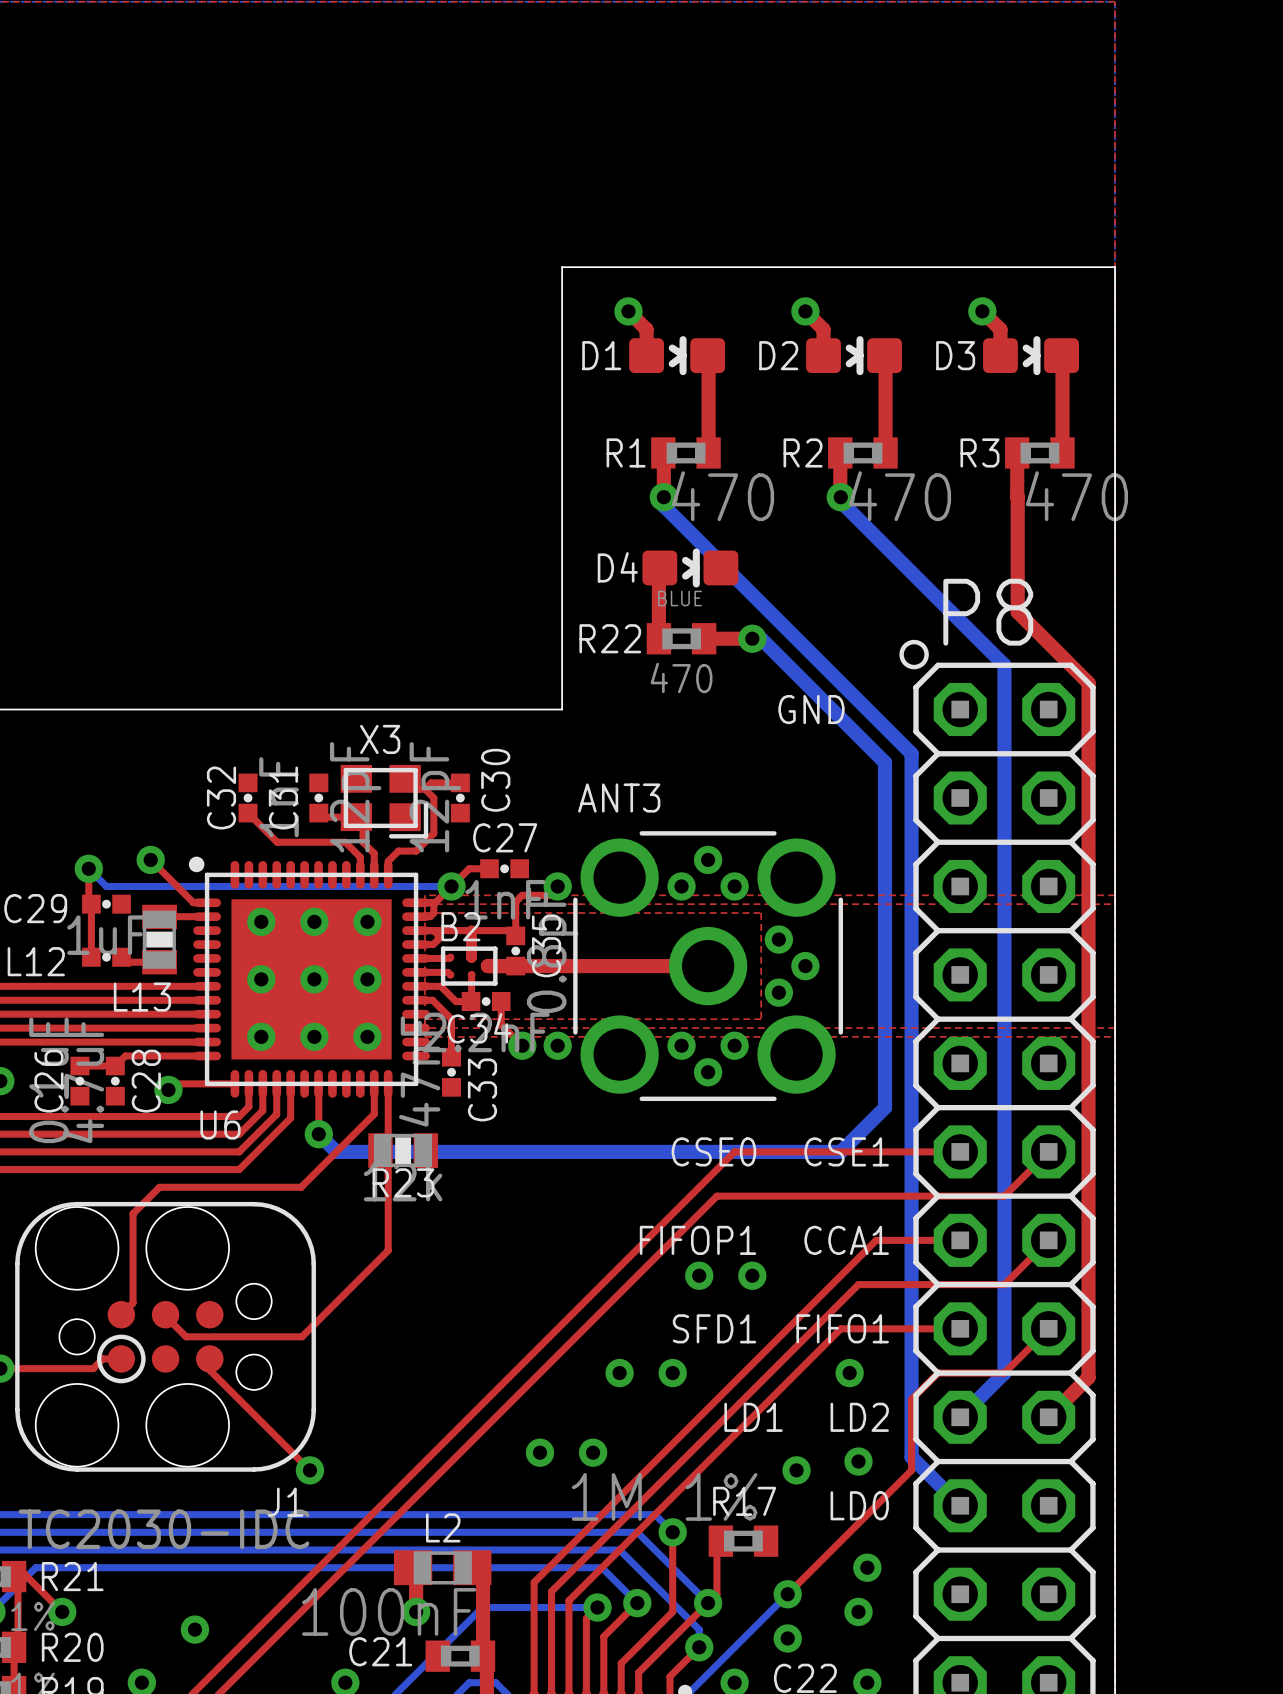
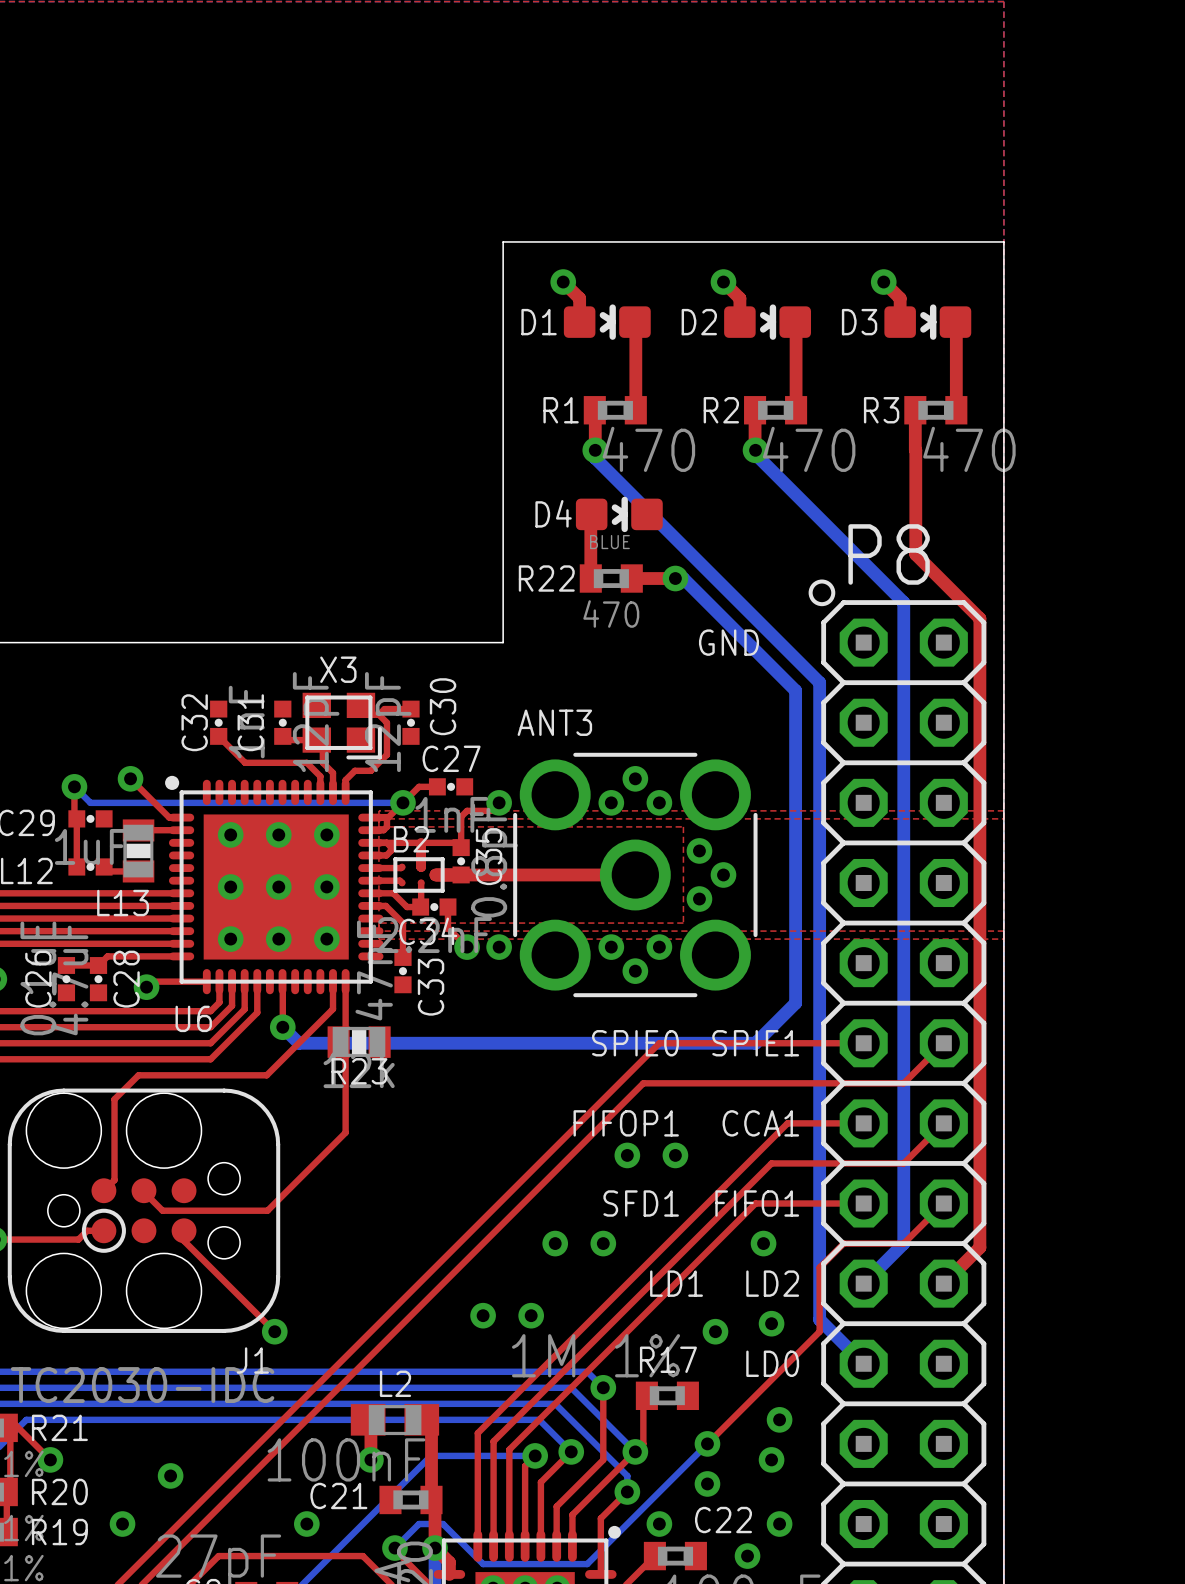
text: CSE0 (713, 1151) -> SPIE0 (635, 1043)
text: CSE1 (846, 1151) -> SPIE1 (755, 1043)

